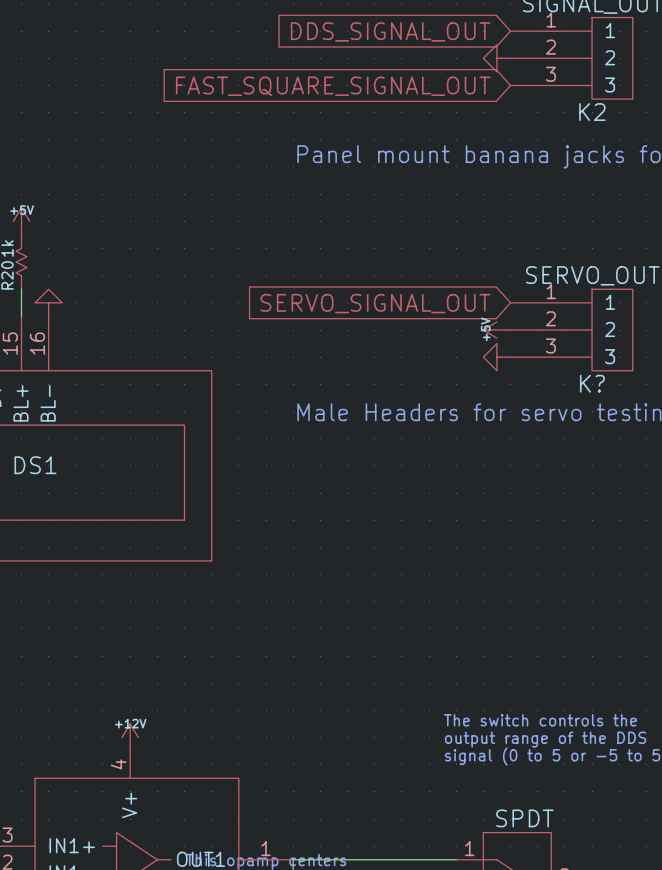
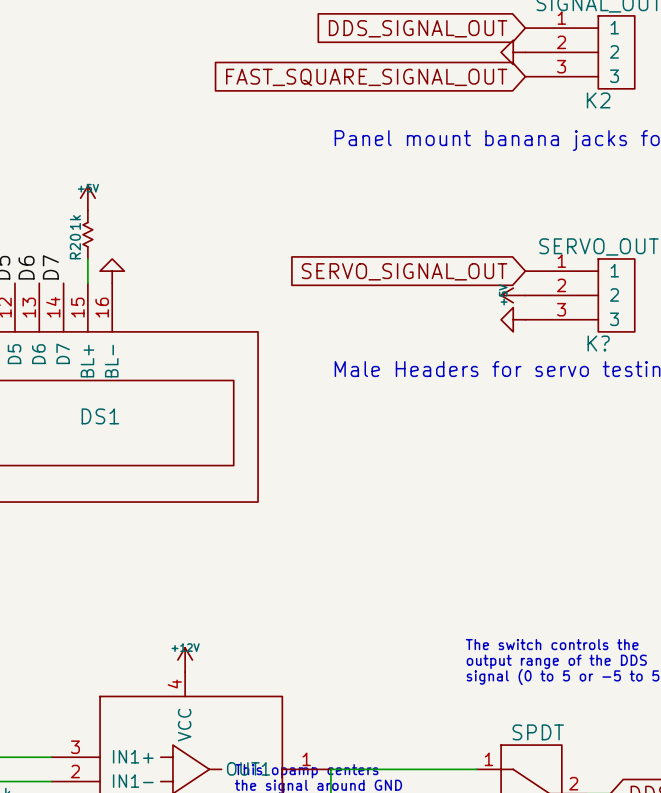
part pin name: V+ (129, 805) -> VCC (184, 725)

